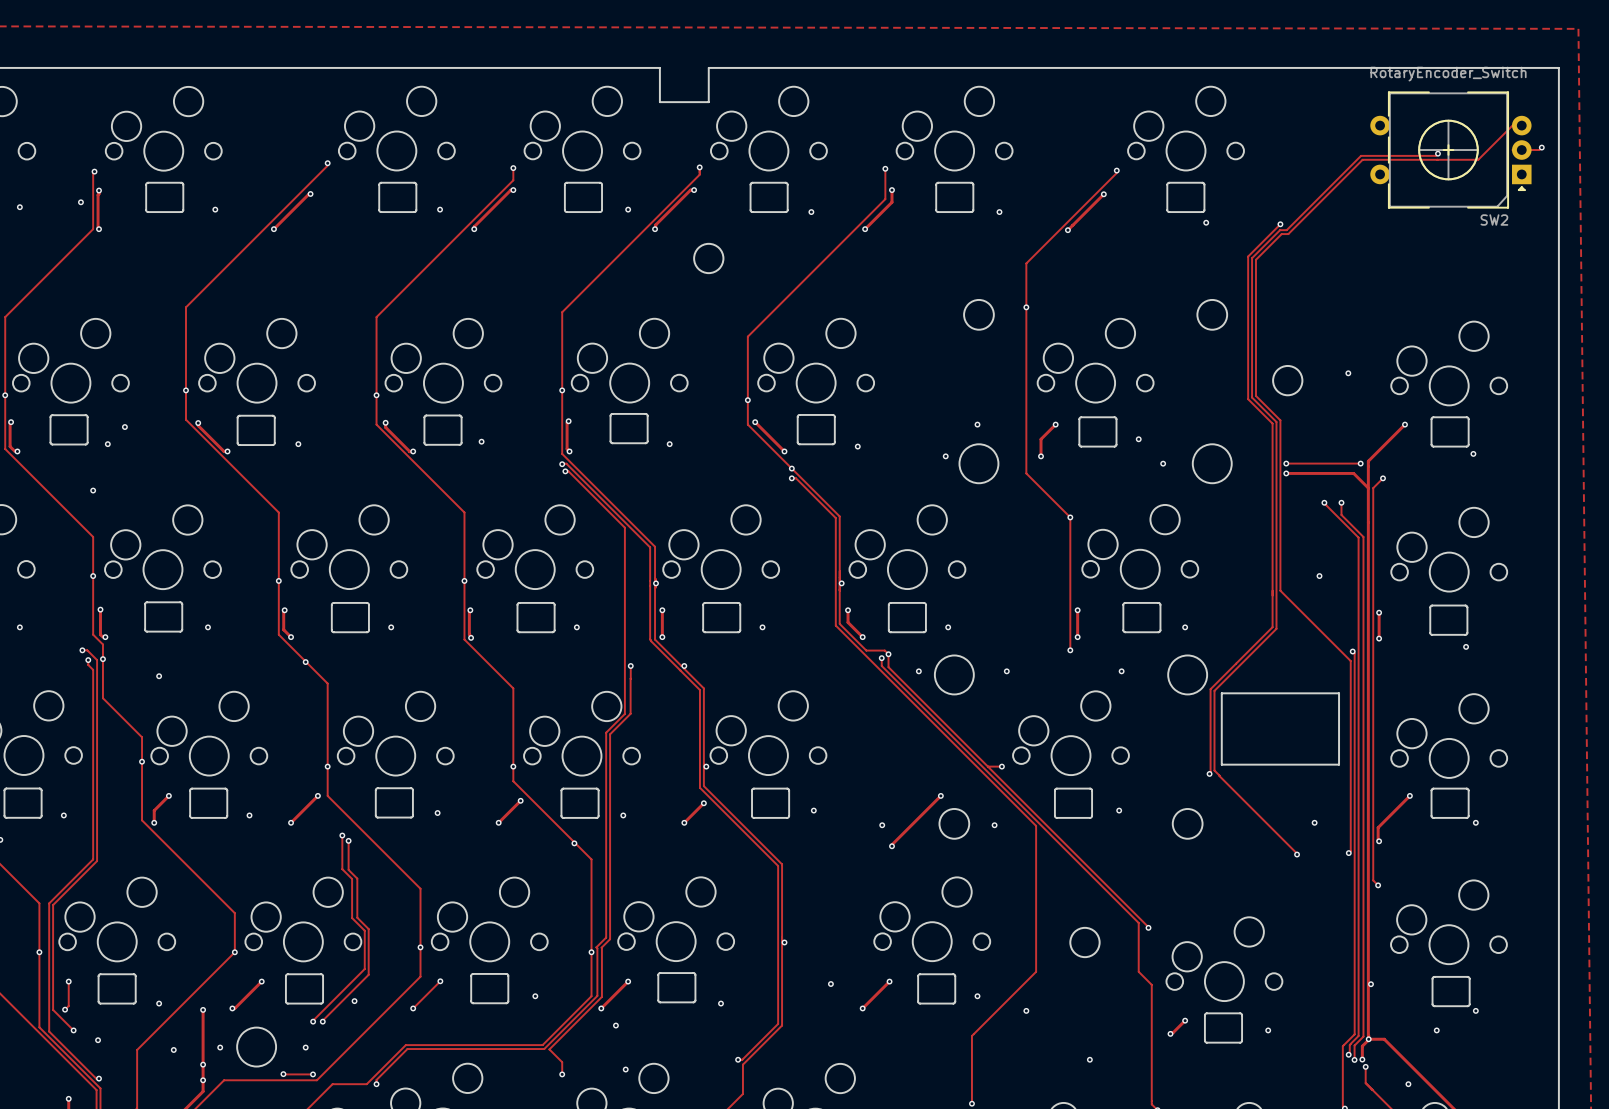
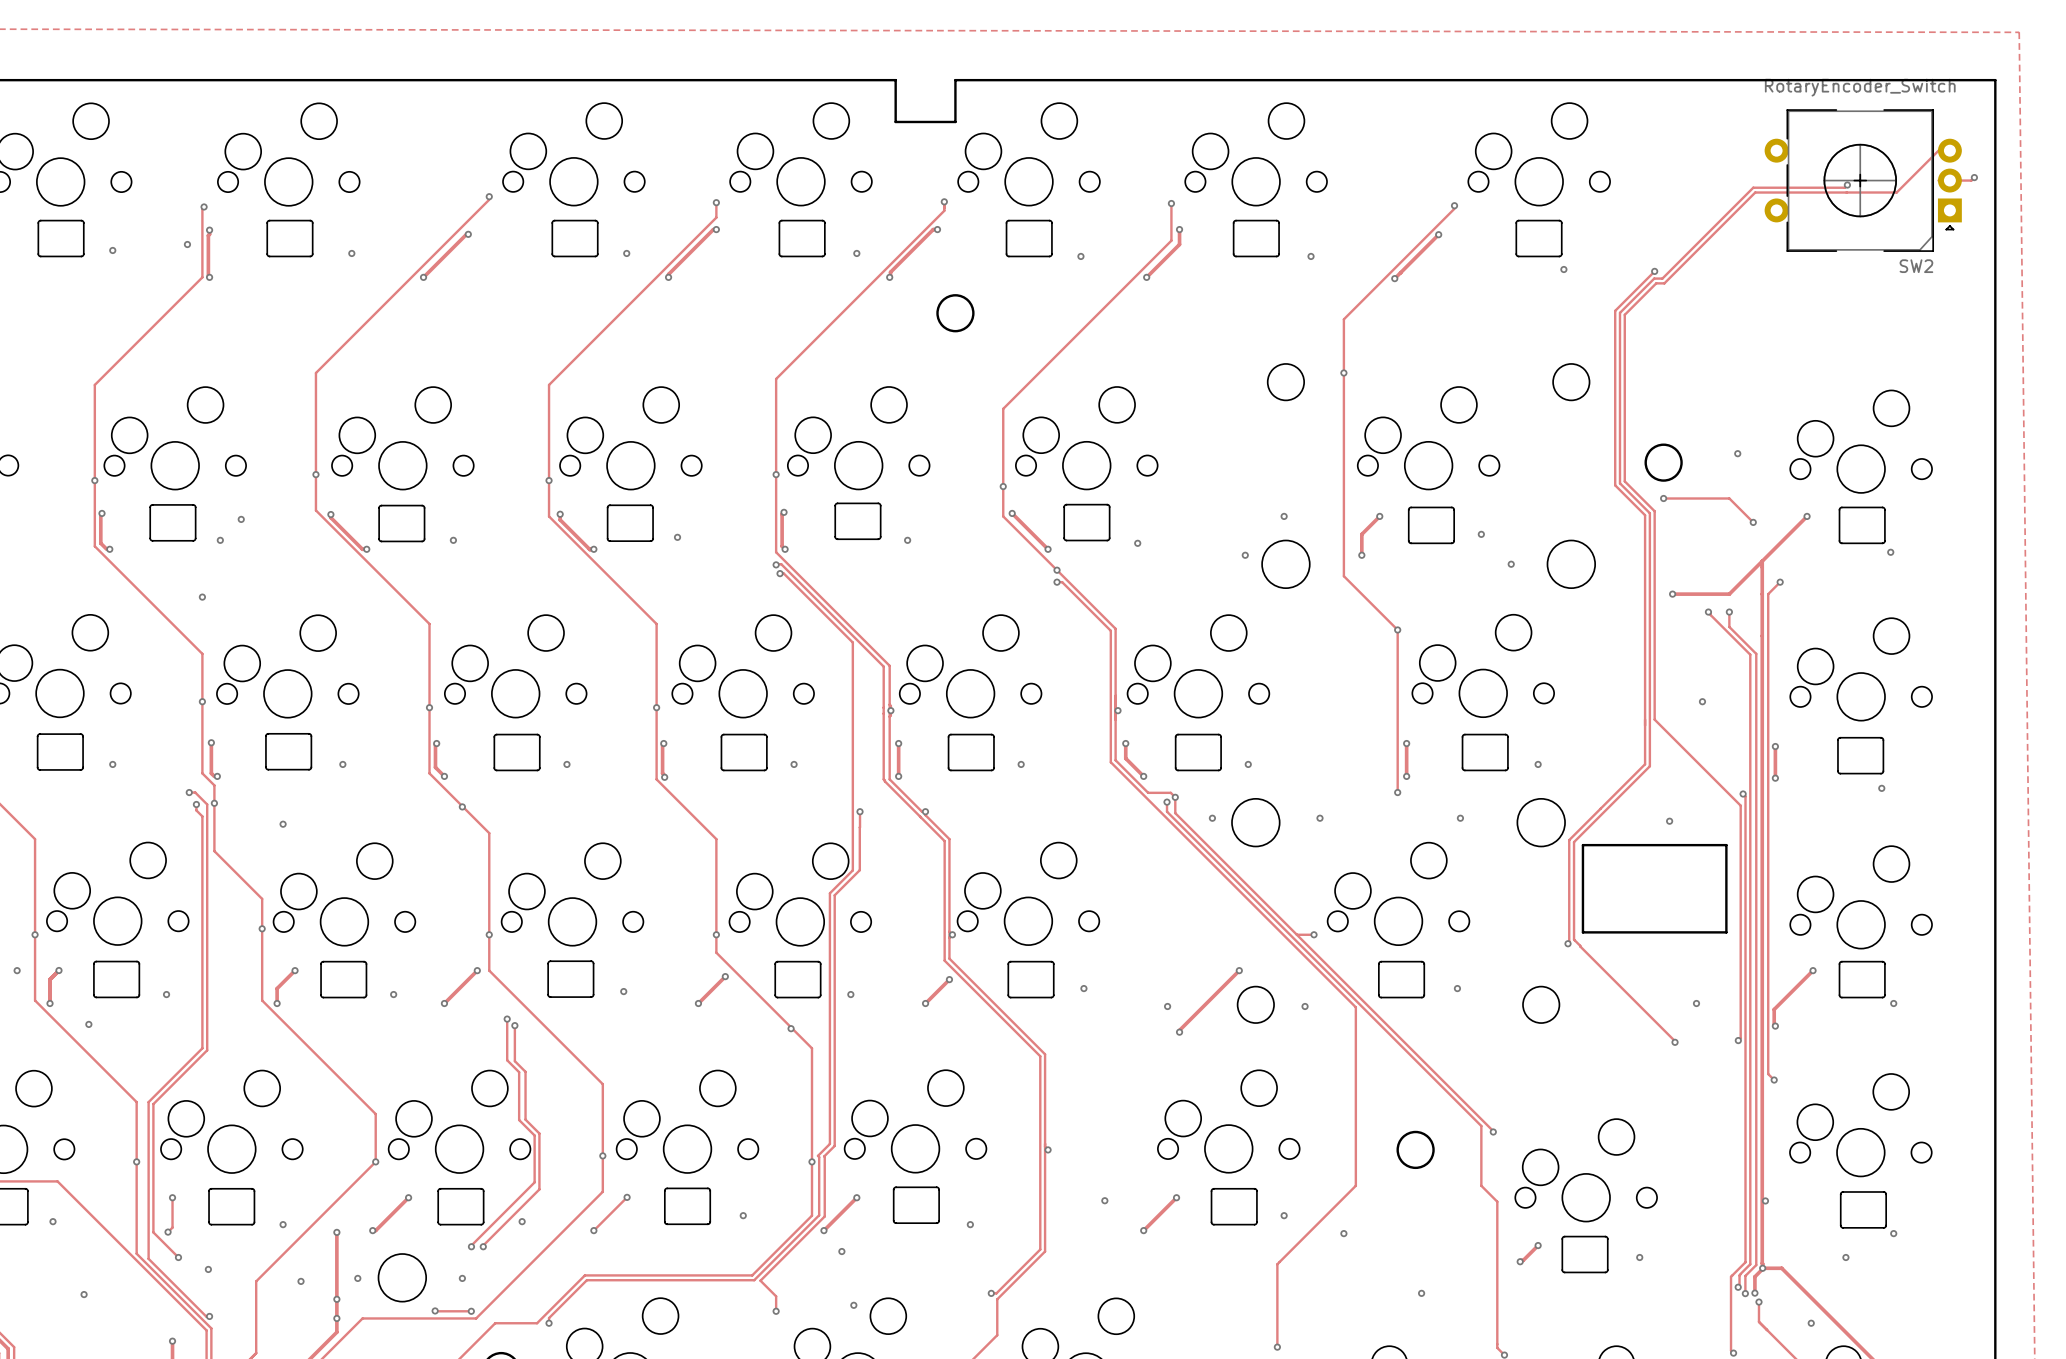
track: none -> (1663, 498) (1729, 498) (1753, 522)
via: none -> (1663, 498)
track: none -> (1762, 561) (1729, 594) (1672, 594)
track: (1286, 463) (1360, 463) -> none
via: (1286, 463) -> none
via position: (1360, 463) -> (1753, 522)
track: (1286, 473) (1353, 473) (1368, 488) -> none
via: (1286, 473) -> none
via: none -> (1672, 594)
via: none -> (1669, 821)

